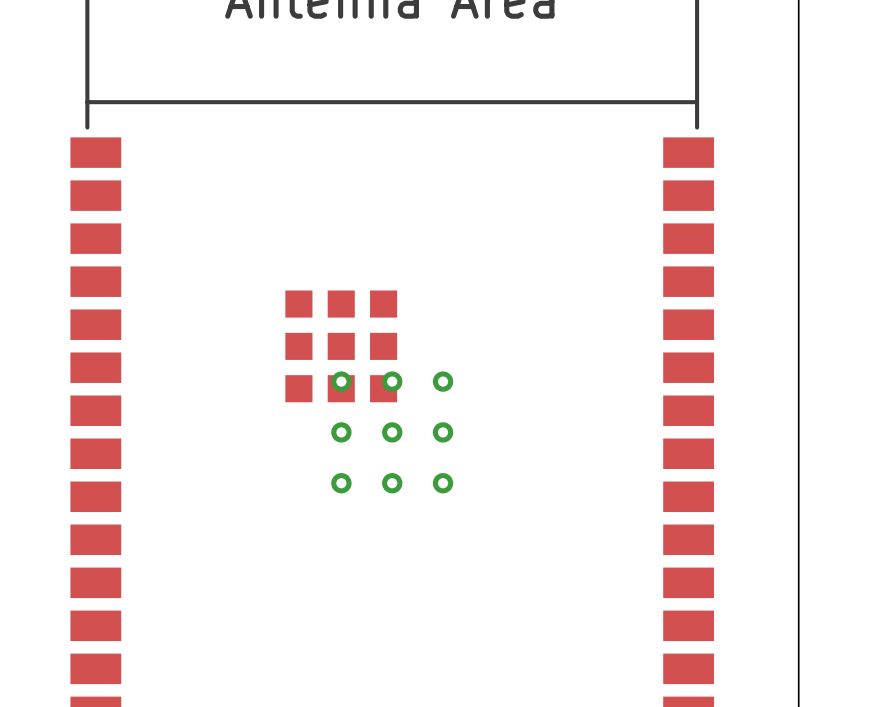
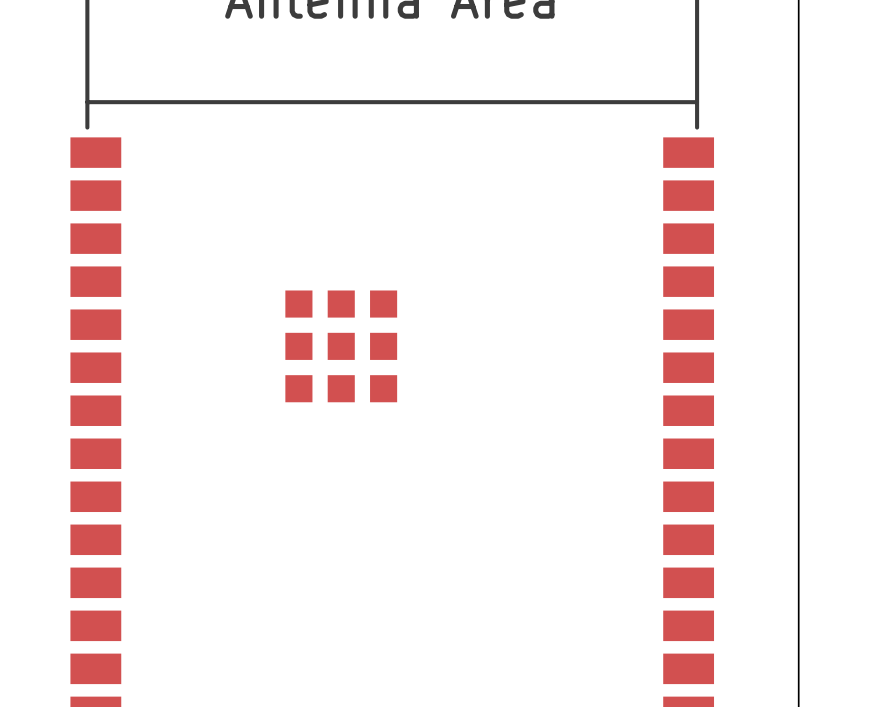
via: (341, 381) -> none
via: (392, 381) -> none
via: (443, 381) -> none
via: (341, 432) -> none
via: (392, 432) -> none
via: (443, 432) -> none
via: (341, 483) -> none
via: (392, 483) -> none
via: (443, 483) -> none

